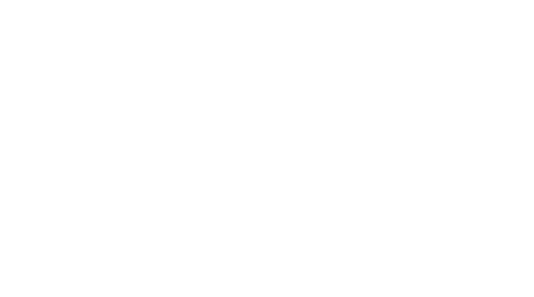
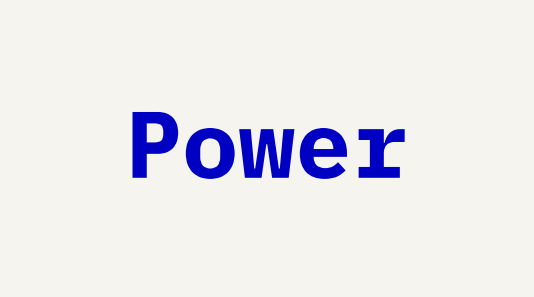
text: none -> Power (268, 145)

